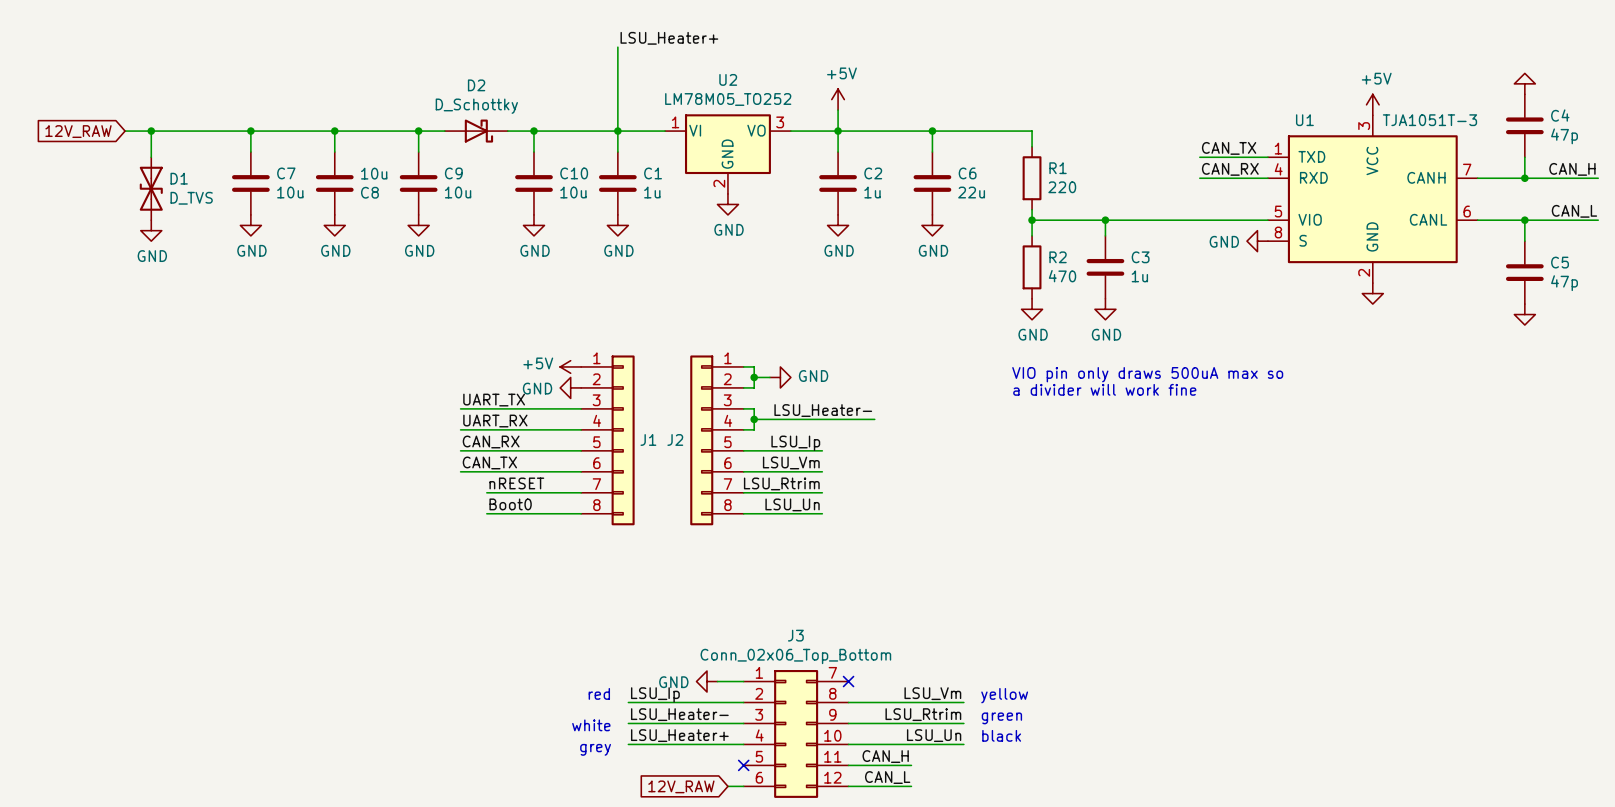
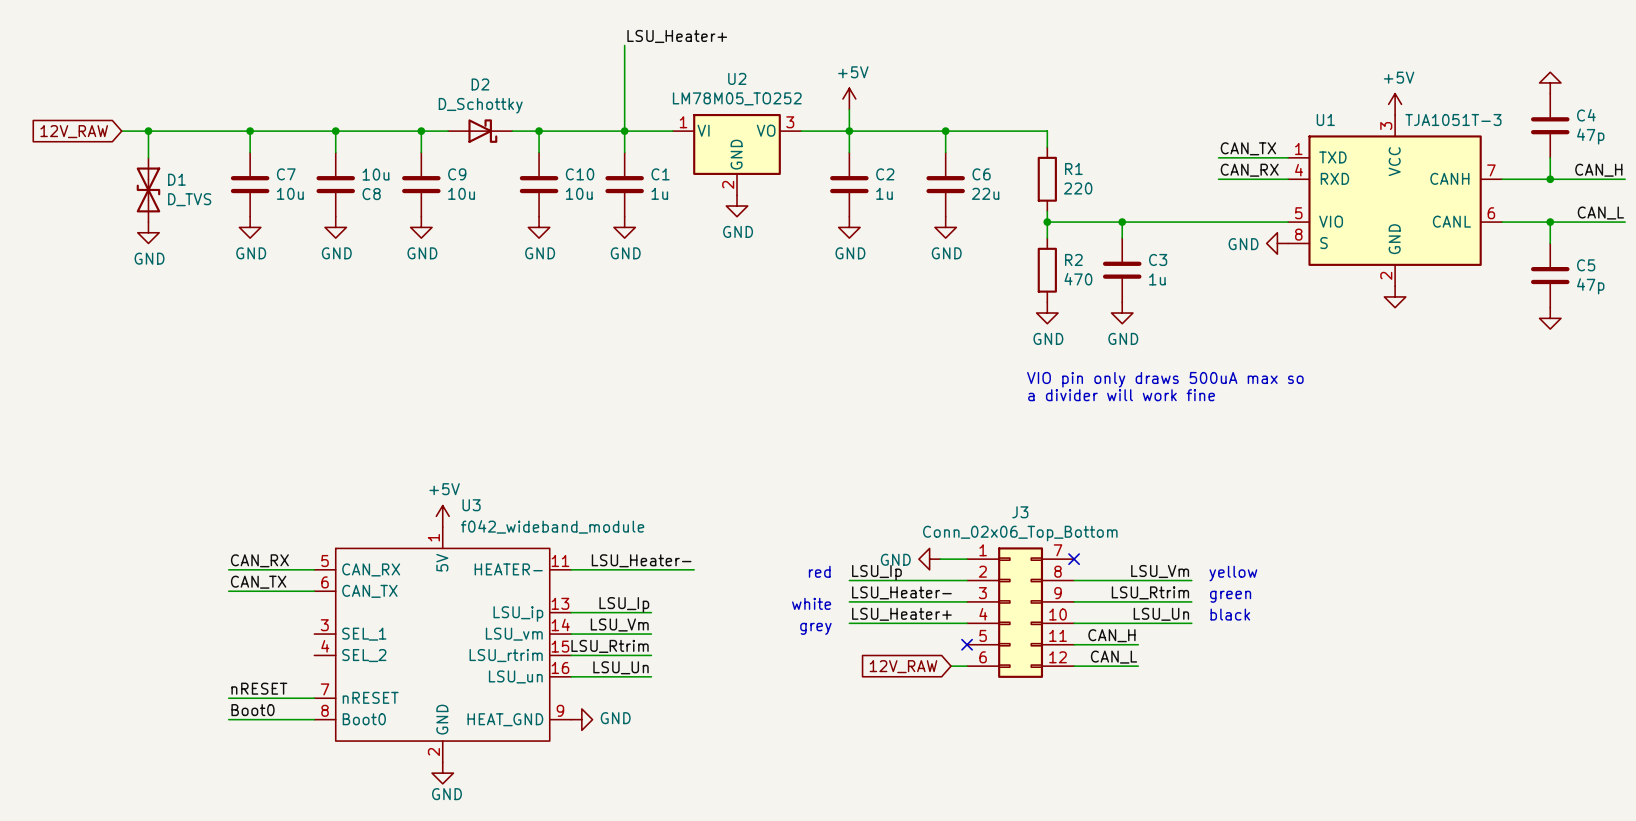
power symbol rotation: 0° (570, 366) -> 90° clockwise (442, 516)
power symbol position: +5V (570, 366) -> +5V (442, 516)
wire: (743, 366) (754, 366) (754, 387) (743, 387) -> none
wire: (754, 377) (769, 377) -> none
junction: (754, 377) -> none
power symbol: GND (780, 377) -> none
power symbol: GND (570, 387) -> none
label: UART_TX (494, 400) -> none
wire: (460, 408) (581, 408) -> none
wire: (743, 408) (754, 408) (754, 429) (743, 429) -> none
label: LSU_Heater- (823, 410) -> none
wire: (754, 419) (874, 419) -> none
junction: (754, 419) -> none
label: UART_RX (495, 421) -> none
wire: (460, 429) (581, 429) -> none
J1: (607, 440) -> none
J2: (716, 440) -> none
label: CAN_RX (491, 442) -> none
label: LSU_Ip (795, 443) -> none
wire: (460, 450) (581, 450) -> none
wire: (743, 450) (822, 450) -> none
label: CAN_TX (489, 462) -> none
label: LSU_Vm (791, 462) -> none
wire: (460, 471) (581, 471) -> (571, 569) (694, 569)
wire: (743, 471) (822, 471) -> none
label: nRESET (516, 483) -> none
label: LSU_Rtrim (781, 483) -> none
wire: (486, 492) (581, 492) -> none
wire: (743, 492) (822, 492) -> none
label: Boot0 (510, 504) -> none
label: LSU_Un (792, 504) -> none
wire: (486, 513) (581, 513) -> none
wire: (743, 513) (822, 513) -> (571, 612) (651, 612)
power symbol: none -> GND (929, 559)
wire: none -> (940, 559) (967, 559)
no-connect mark: none -> (1074, 559)
label: none -> CAN_RX (259, 560)
label: none -> LSU_Heater- (641, 560)
wire: none -> (228, 569) (314, 569)
text: none -> red (819, 571)
label: none -> LSU_Vm (1160, 571)
label: none -> LSU_Ip (876, 572)
text: none -> yellow (1233, 573)
wire: none -> (1074, 580) (1191, 580)
label: none -> CAN_TX (258, 582)
wire: none -> (228, 591) (314, 591)
label: none -> LSU_Heater- (901, 592)
label: none -> LSU_Rtrim (1150, 592)
text: none -> green (1230, 596)
wire: none -> (1074, 601) (1191, 601)
text: none -> white (811, 603)
label: none -> LSU_Heater+ (901, 614)
label: none -> LSU_Un (1161, 614)
text: none -> black (1230, 614)
wire: none -> (1074, 623) (1191, 623)
label: none -> LSU_Vm (619, 624)
text: none -> grey (815, 628)
wire: none -> (571, 634) (651, 634)
label: none -> CAN_H (1111, 635)
U3: none -> f042_wideband_module (442, 644)
no-connect mark: none -> (967, 644)
wire: none -> (1074, 644) (1138, 644)
label: none -> LSU_Rtrim (610, 646)
wire: none -> (571, 655) (651, 655)
label: none -> CAN_L (1113, 657)
global label: none -> 12V_RAW (903, 666)
wire: none -> (951, 666) (967, 666)
wire: none -> (1074, 666) (1138, 666)
label: none -> LSU_Un (621, 667)
wire: none -> (571, 676) (651, 676)
label: none -> nRESET (259, 688)
power symbol: GND (707, 681) -> none
wire: (717, 681) (743, 681) -> none
no-connect mark: (848, 681) -> none
wire: none -> (228, 698) (314, 698)
text: red (599, 693) -> none
label: LSU_Vm (932, 693) -> none
label position: LSU_Ip (655, 694) -> LSU_Ip (624, 604)
text: yellow (1004, 695) -> none
label: none -> Boot0 (253, 710)
wire: (628, 702) (743, 702) -> none
wire: (848, 702) (963, 702) -> (849, 580) (967, 580)
wire: none -> (228, 719) (314, 719)
power symbol: none -> GND (581, 719)
label: LSU_Heater- (679, 714) -> none
label: LSU_Rtrim (923, 714) -> none
text: green (1001, 718) -> none
wire: (628, 723) (743, 723) -> none
wire: (848, 723) (963, 723) -> (849, 601) (967, 601)
text: white (591, 725) -> none
J3 position: (796, 733) -> (1020, 612)
label: LSU_Heater+ (679, 735) -> none
label: LSU_Un (934, 735) -> none
text: black (1001, 735) -> none
wire: (628, 744) (743, 744) -> none
wire: (848, 744) (963, 744) -> (849, 623) (967, 623)
text: grey (595, 749) -> none
label: CAN_H (885, 756) -> none
power symbol: none -> GND (442, 773)
no-connect mark: (743, 765) -> none
wire: (848, 765) (911, 765) -> none
label: CAN_L (887, 777) -> none
global label: 12V_RAW (681, 786) -> none
wire: (727, 786) (743, 786) -> none
wire: (848, 786) (911, 786) -> none

